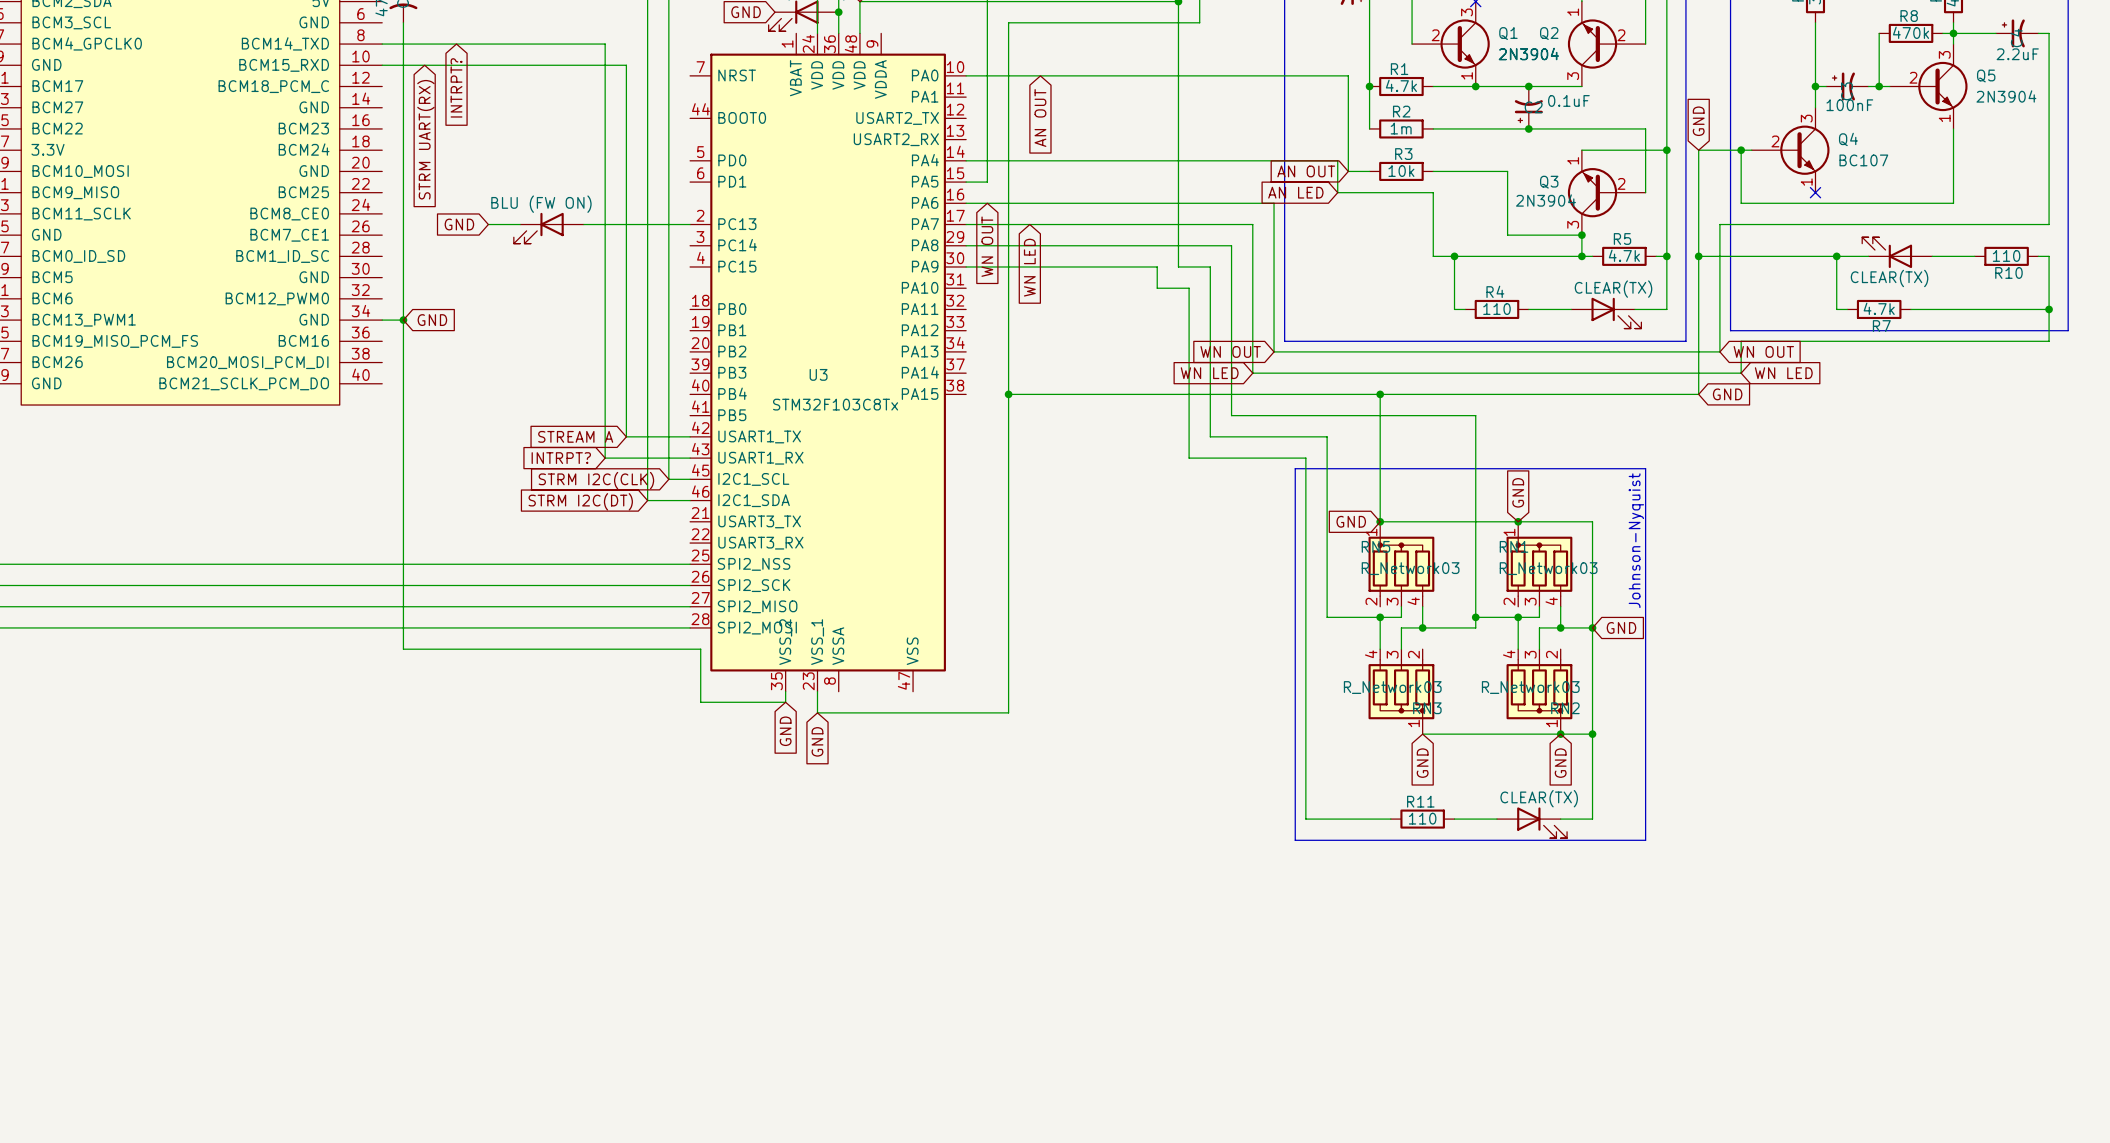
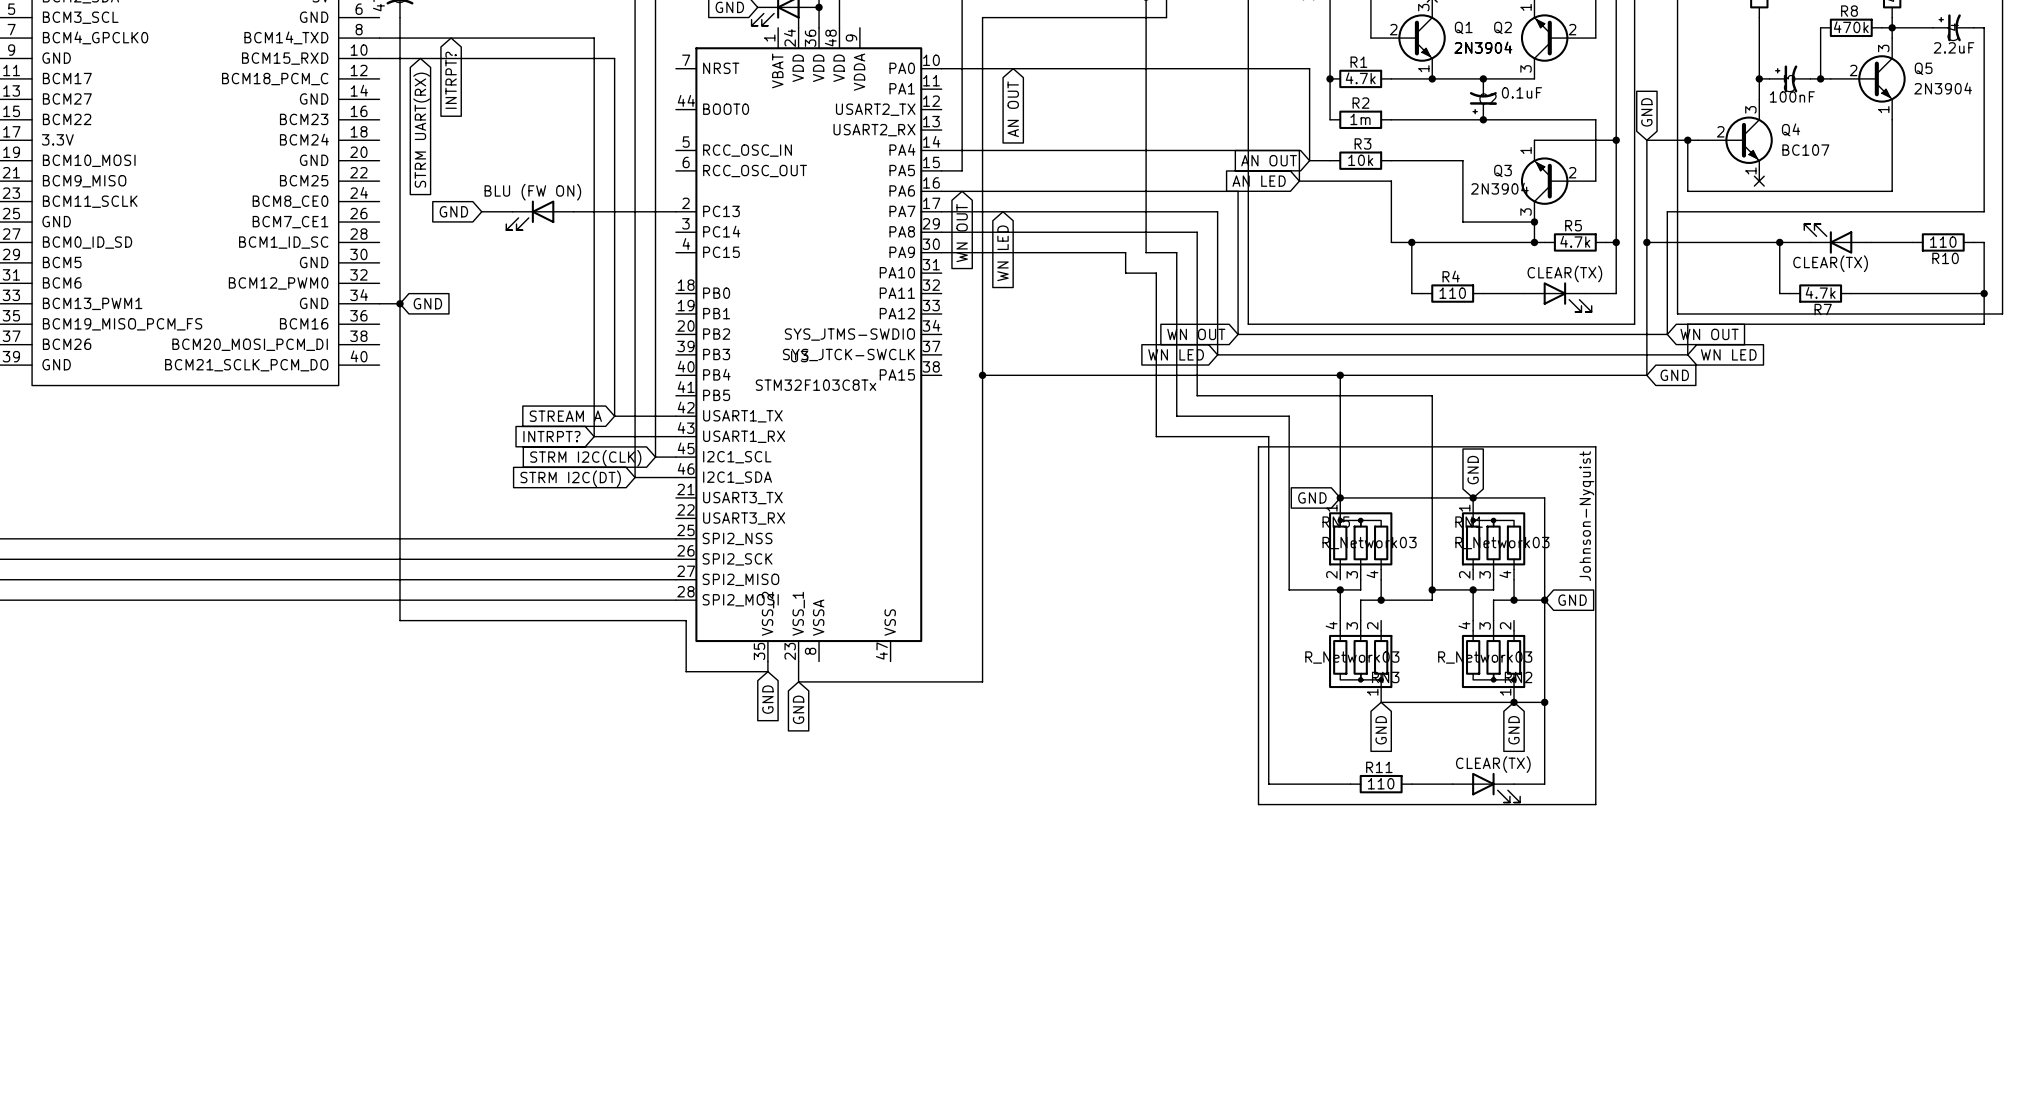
U3 pin name: PD0 (732, 160) -> RCC_OSC_IN (747, 150)
U3 pin name: PD1 (732, 181) -> RCC_OSC_OUT (755, 171)
U3 pin name: PA13 (920, 351) -> SYS_JTMS-SWDIO (849, 334)
U3 pin name: PA14 (920, 372) -> SYS_JTCK-SWCLK (848, 354)

